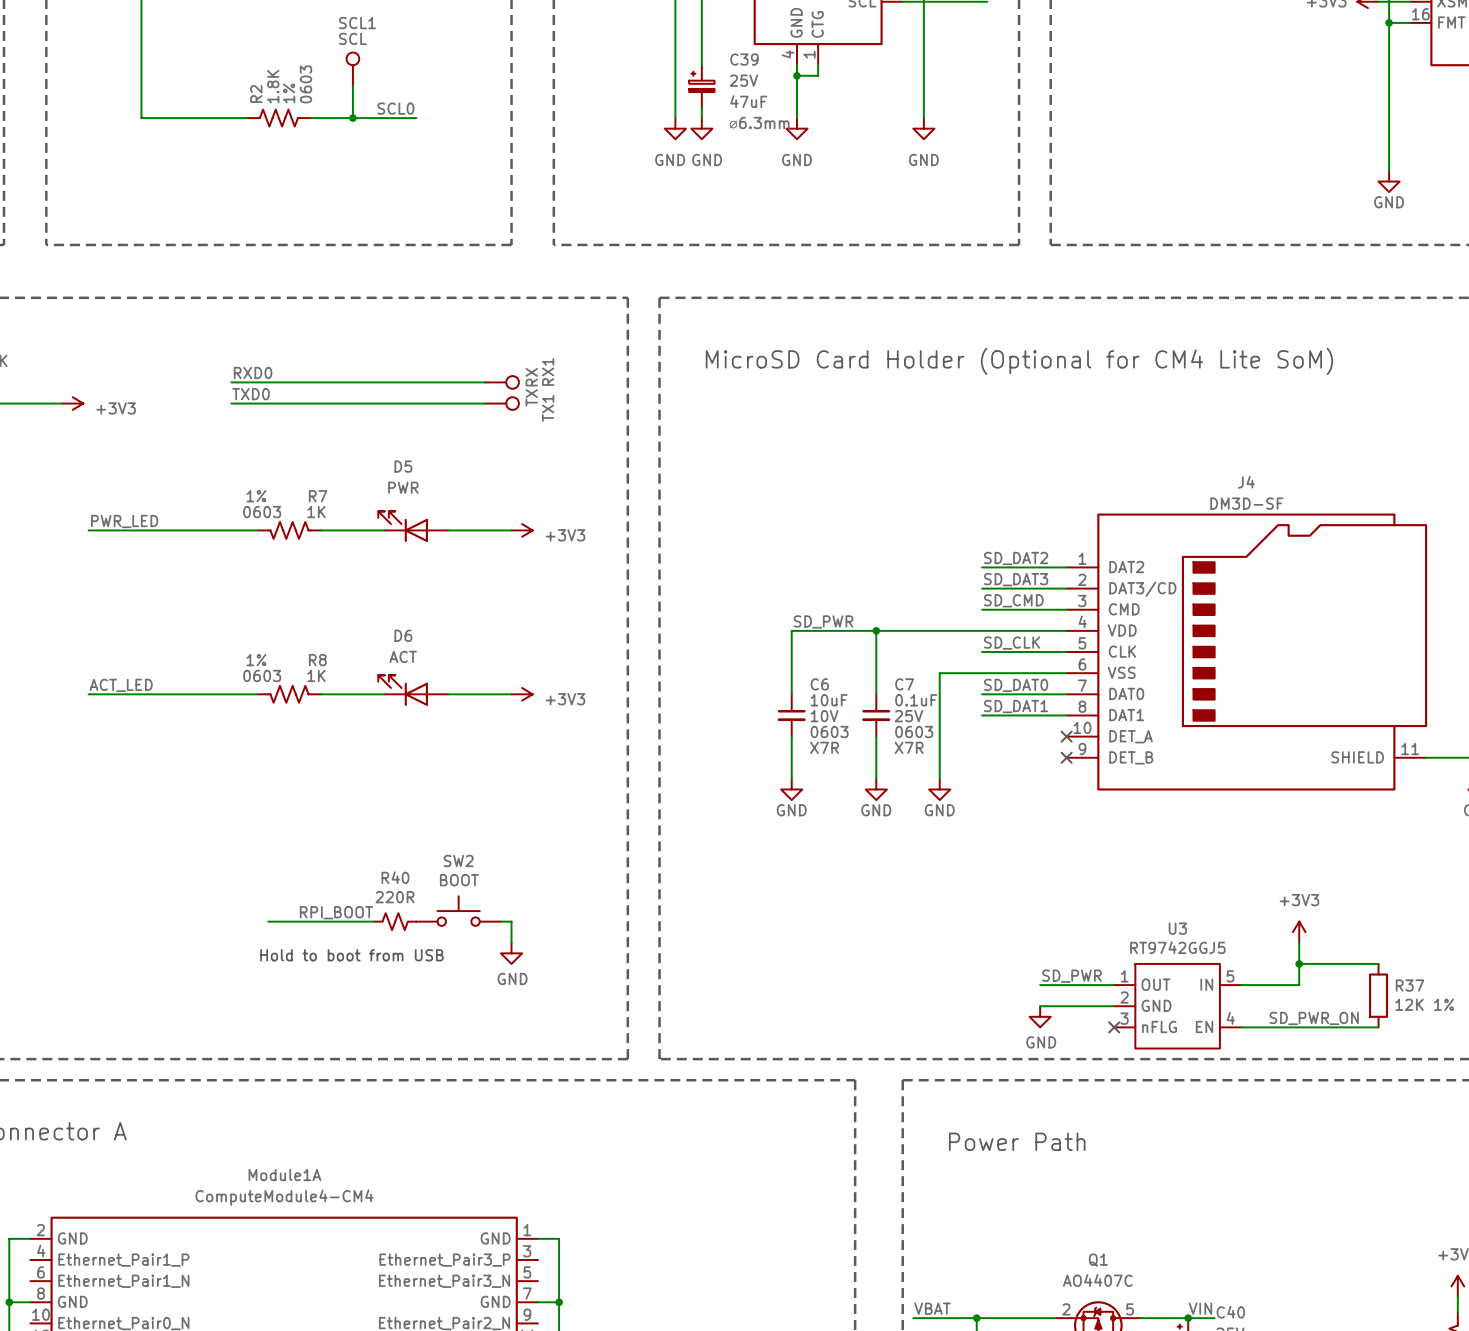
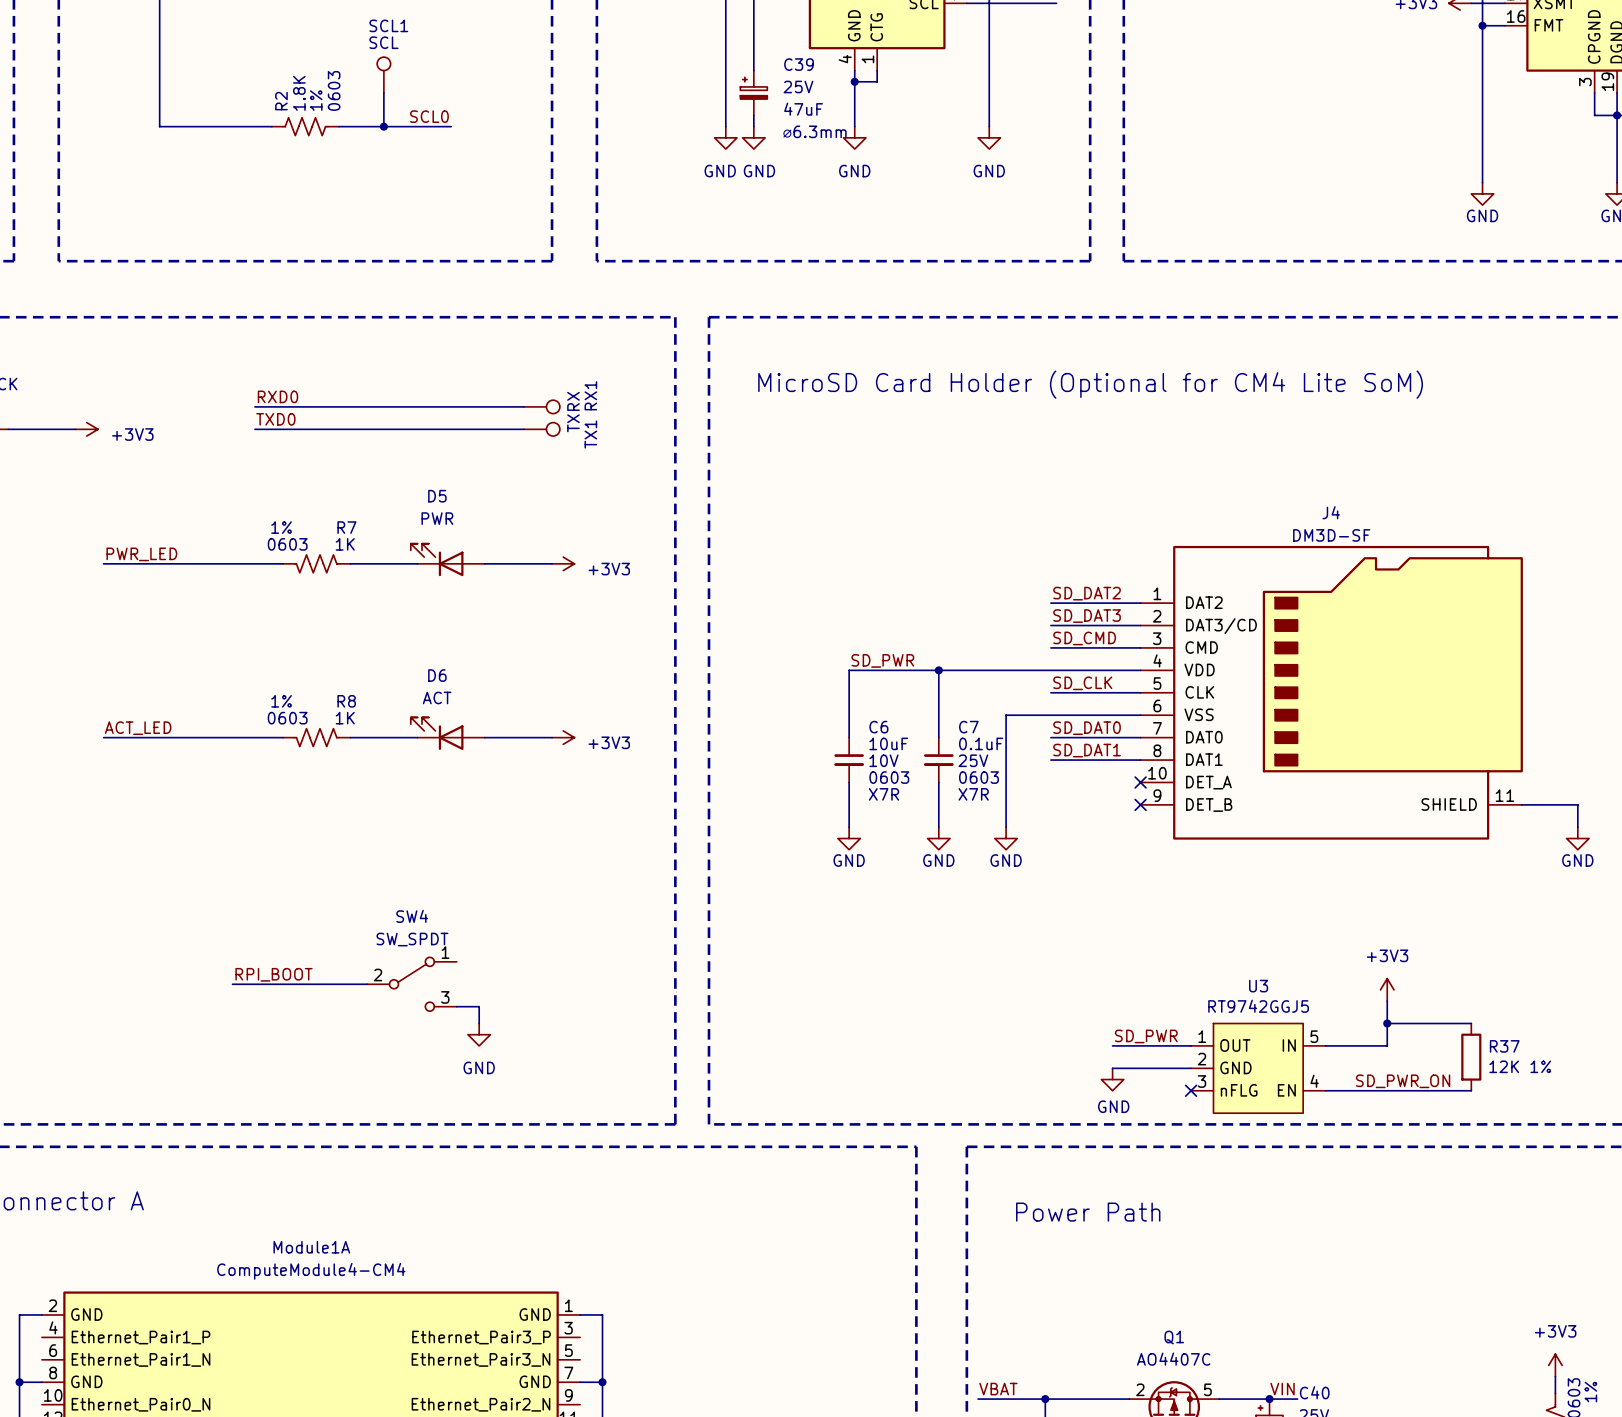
SW2: BOOT (458, 911) -> none
label position: RPI_BOOT (336, 912) -> RPI_BOOT (274, 974)
wire: (268, 921) (374, 921) -> none
R40: 220R (395, 921) -> none
wire: (500, 921) (511, 921) (511, 942) -> none
wire: none -> (232, 984) (367, 984)
SW4: none -> SW_SPDT (411, 984)
wire: none -> (456, 1006) (479, 1006) (479, 1023)
power symbol position: GND (511, 953) -> GND (479, 1034)
text: Hold to boot from USB (351, 955) -> none
power symbol text position: GND (512, 978) -> GND (479, 1067)

